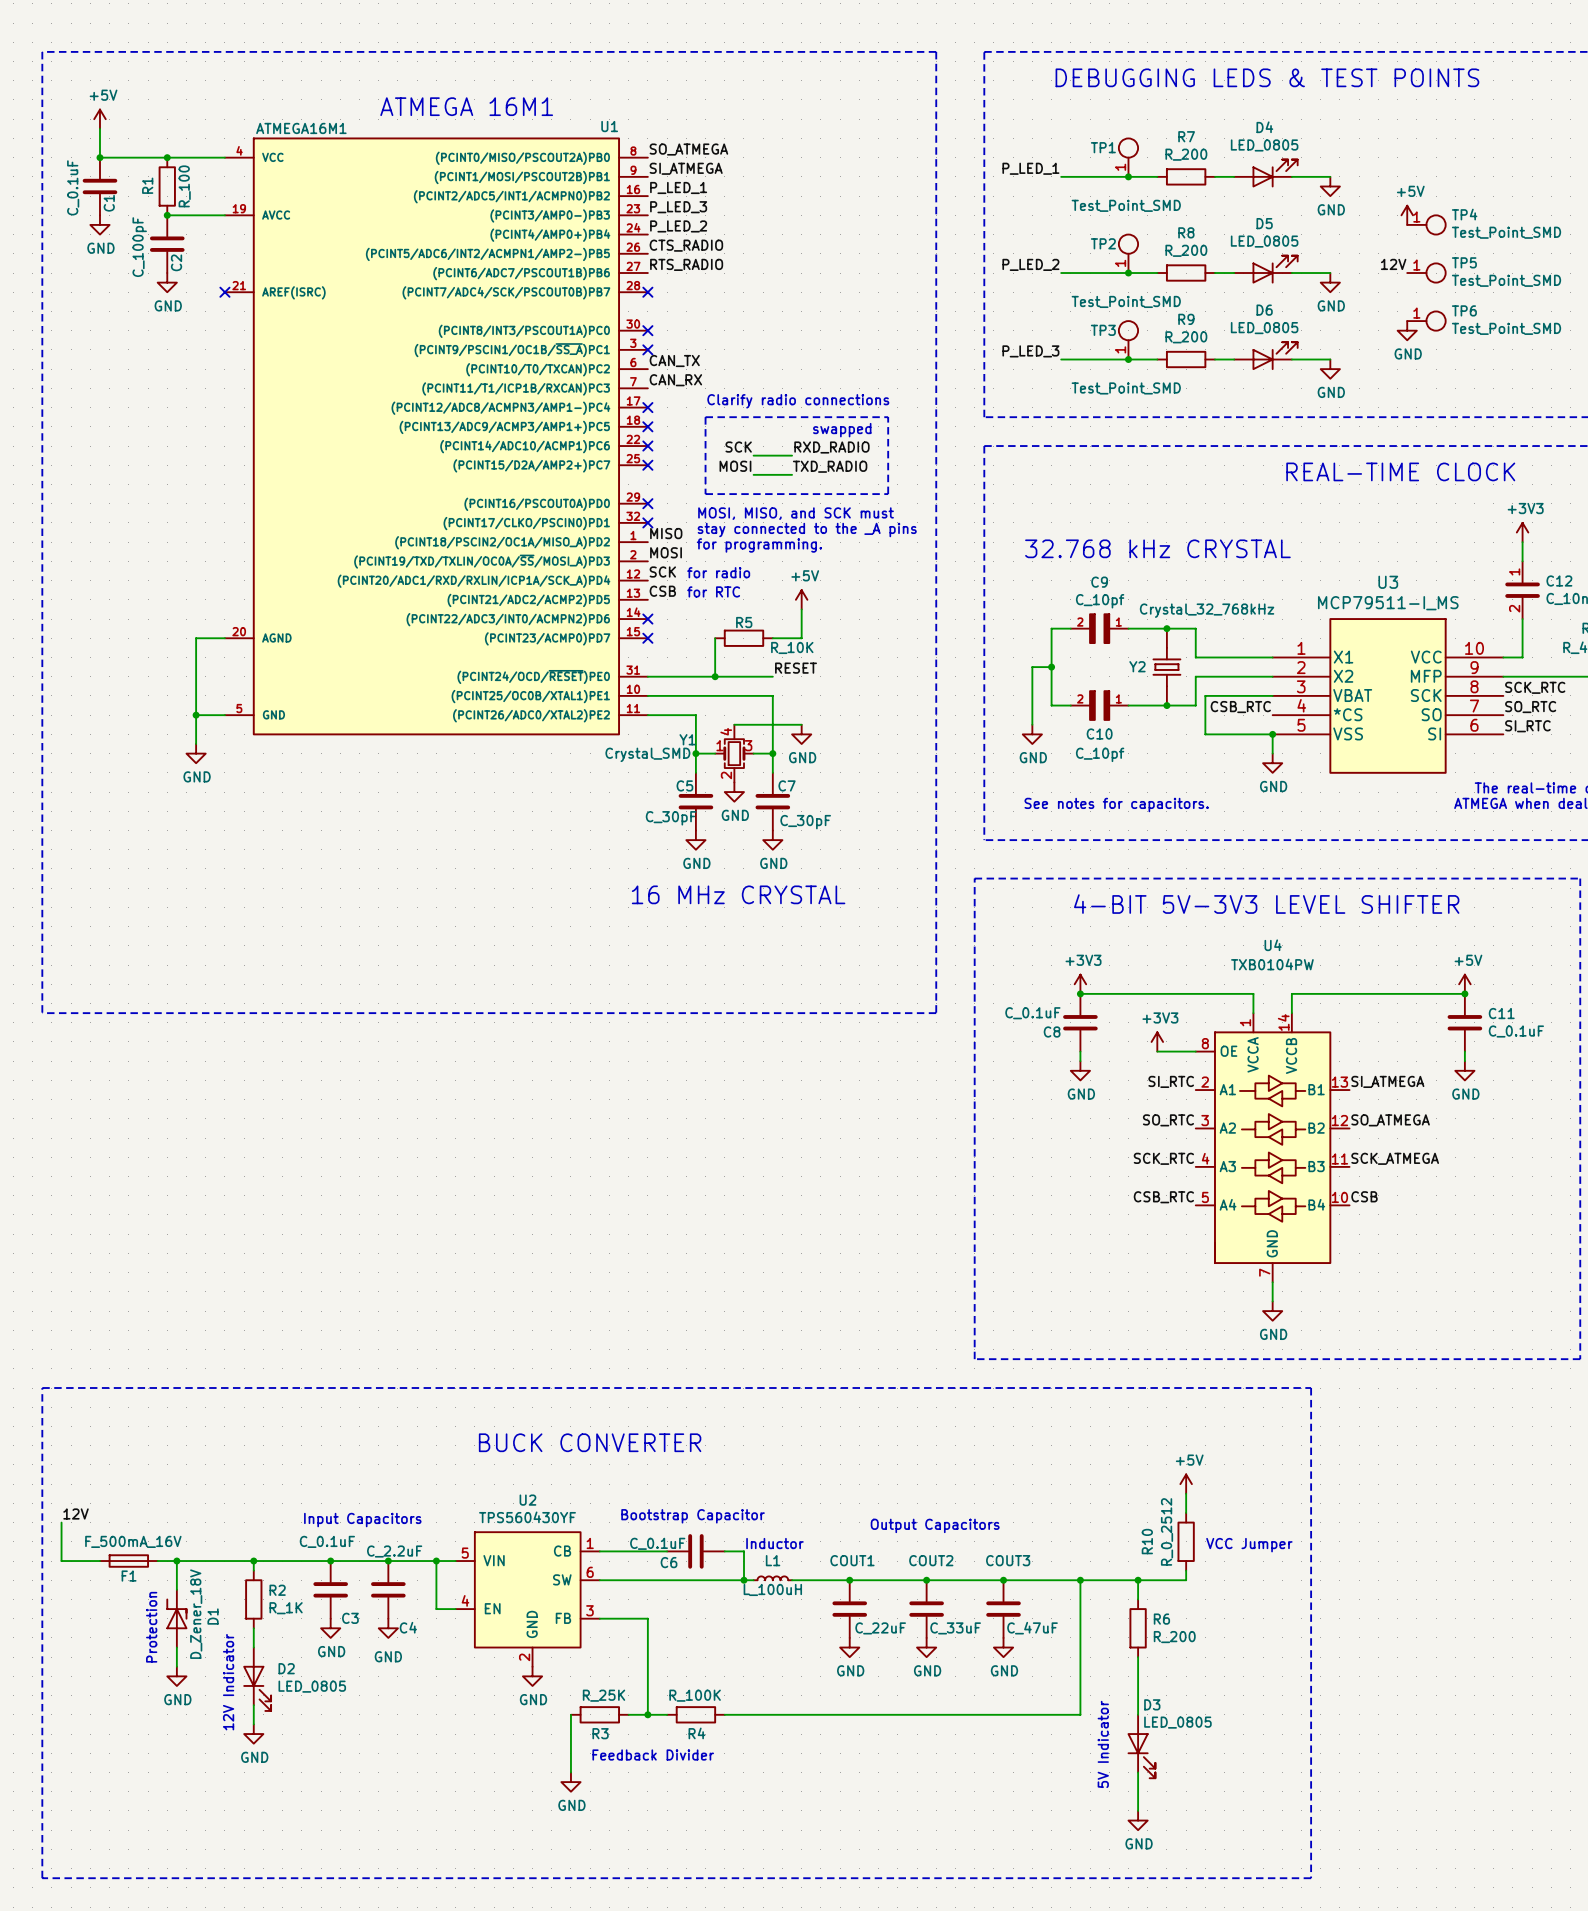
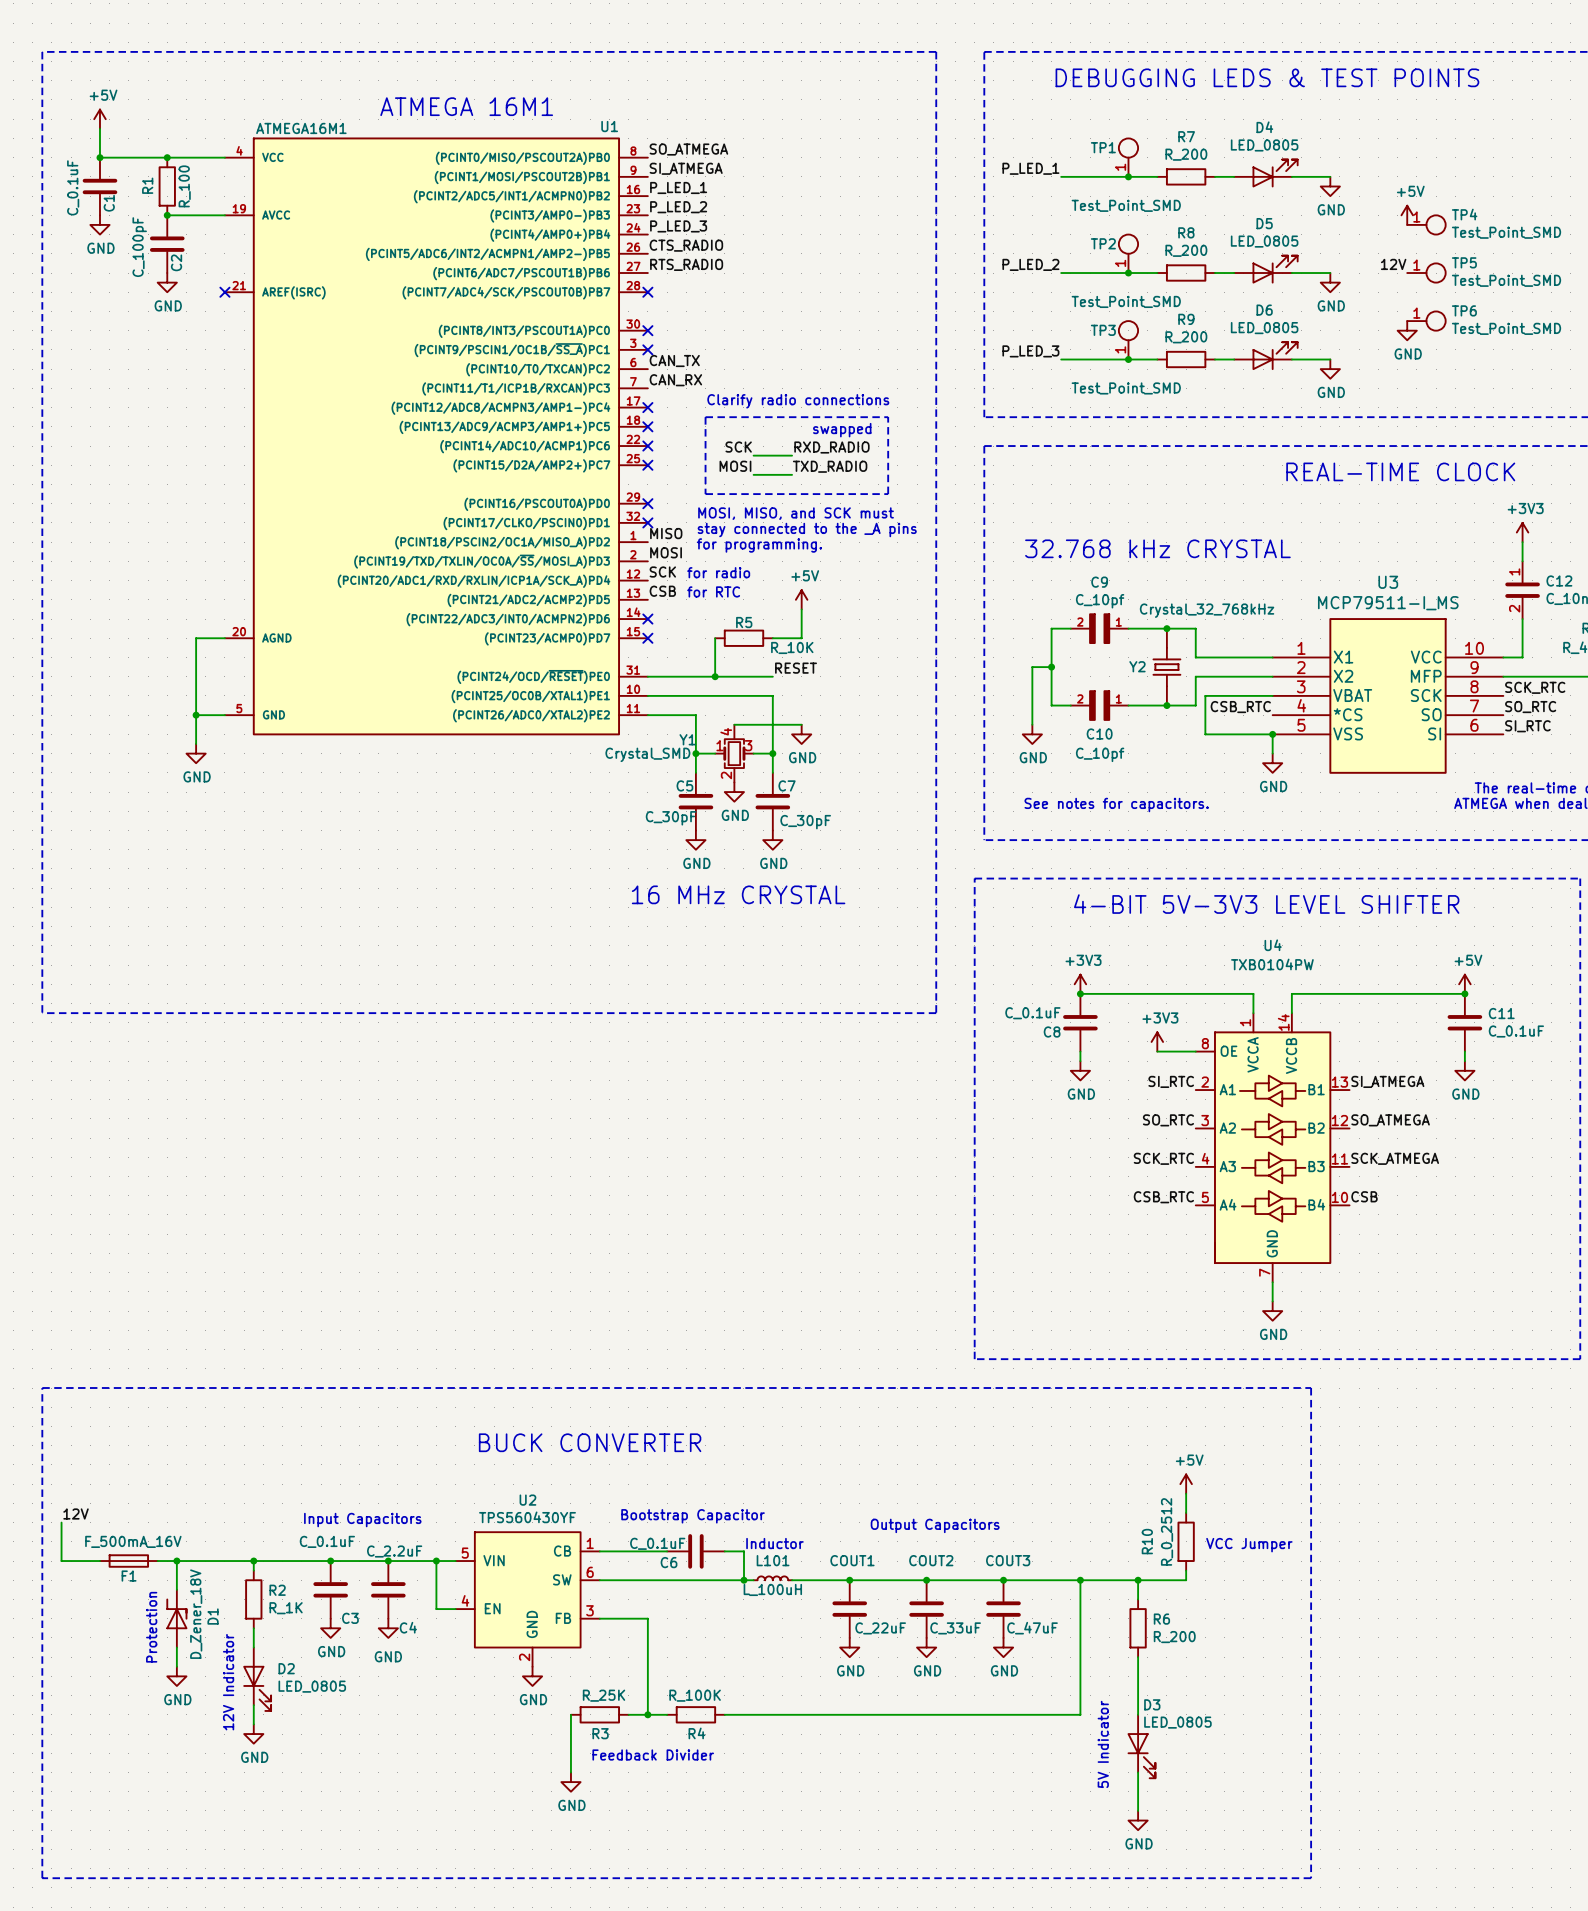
label: P_LED_3 (678, 207) -> P_LED_2 (678, 207)
label: P_LED_2 (678, 226) -> P_LED_3 (678, 226)
L1 name: L1 (773, 1560) -> L101 (773, 1560)

